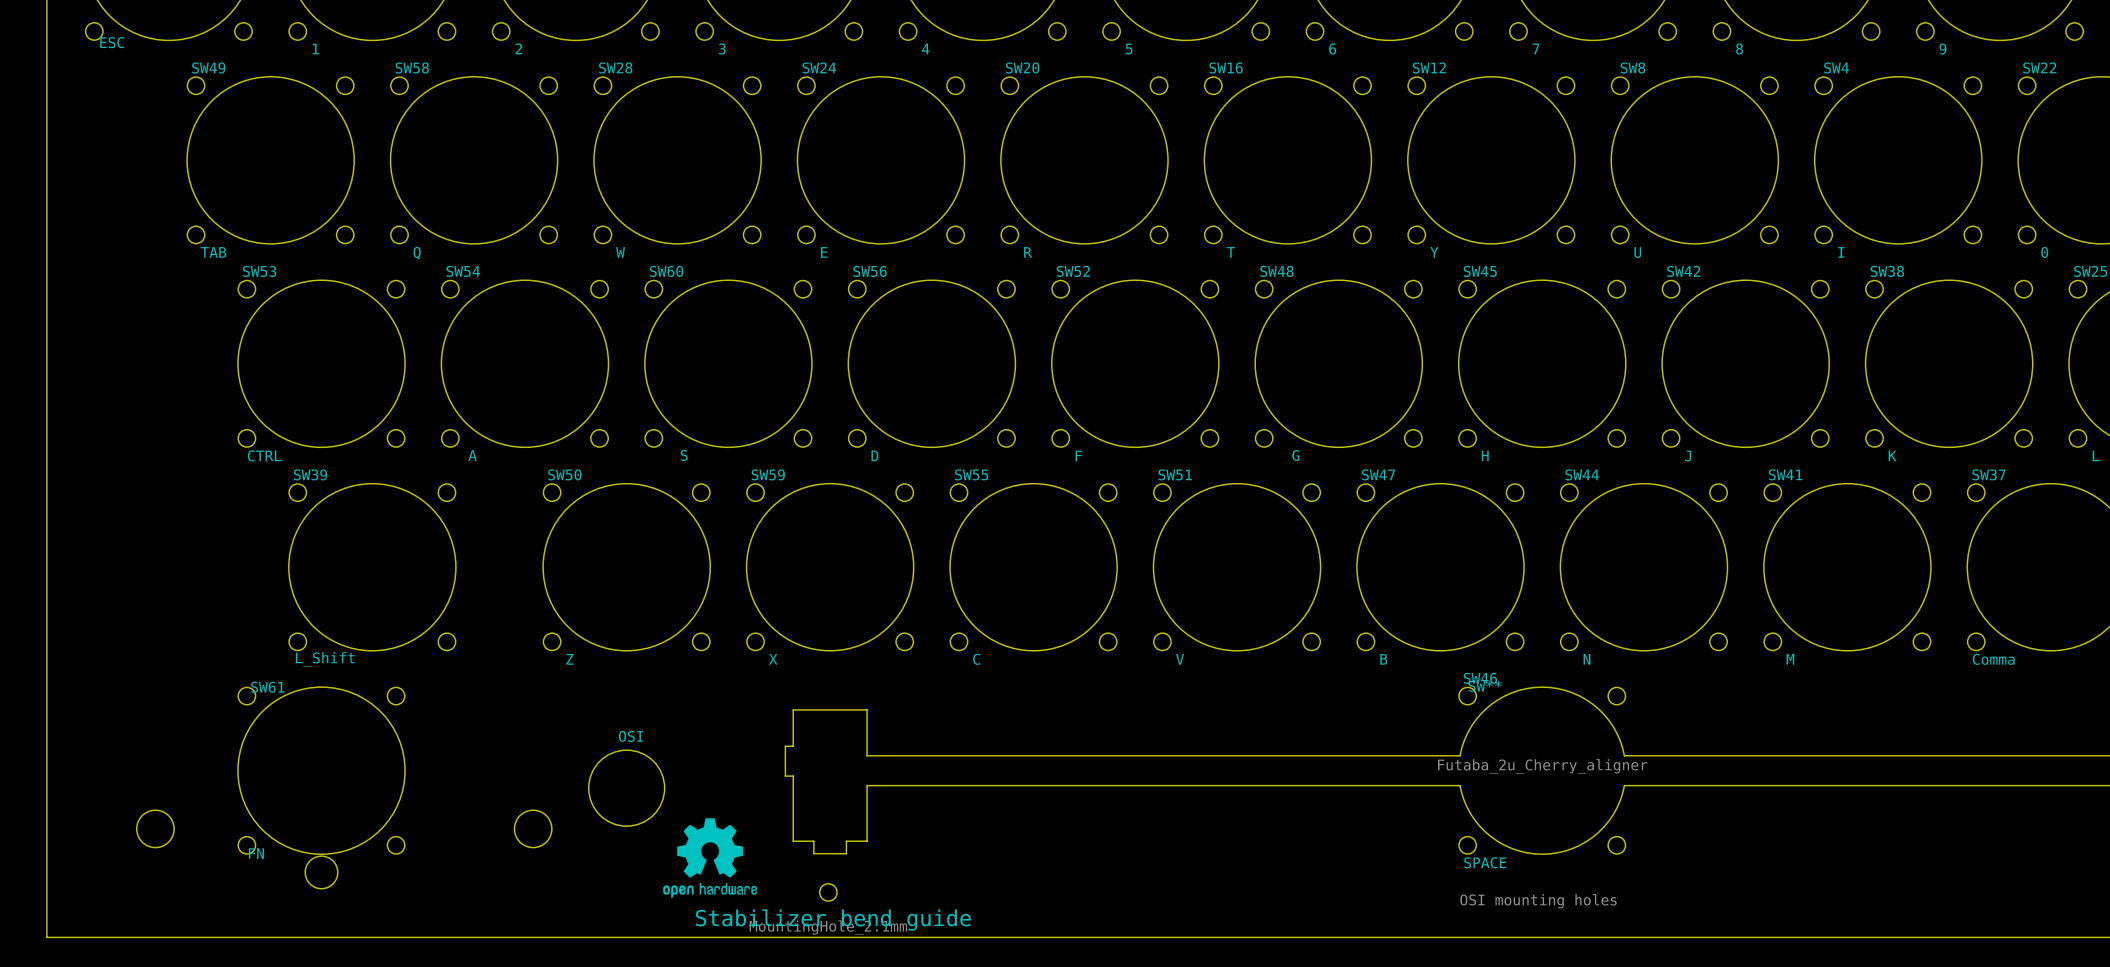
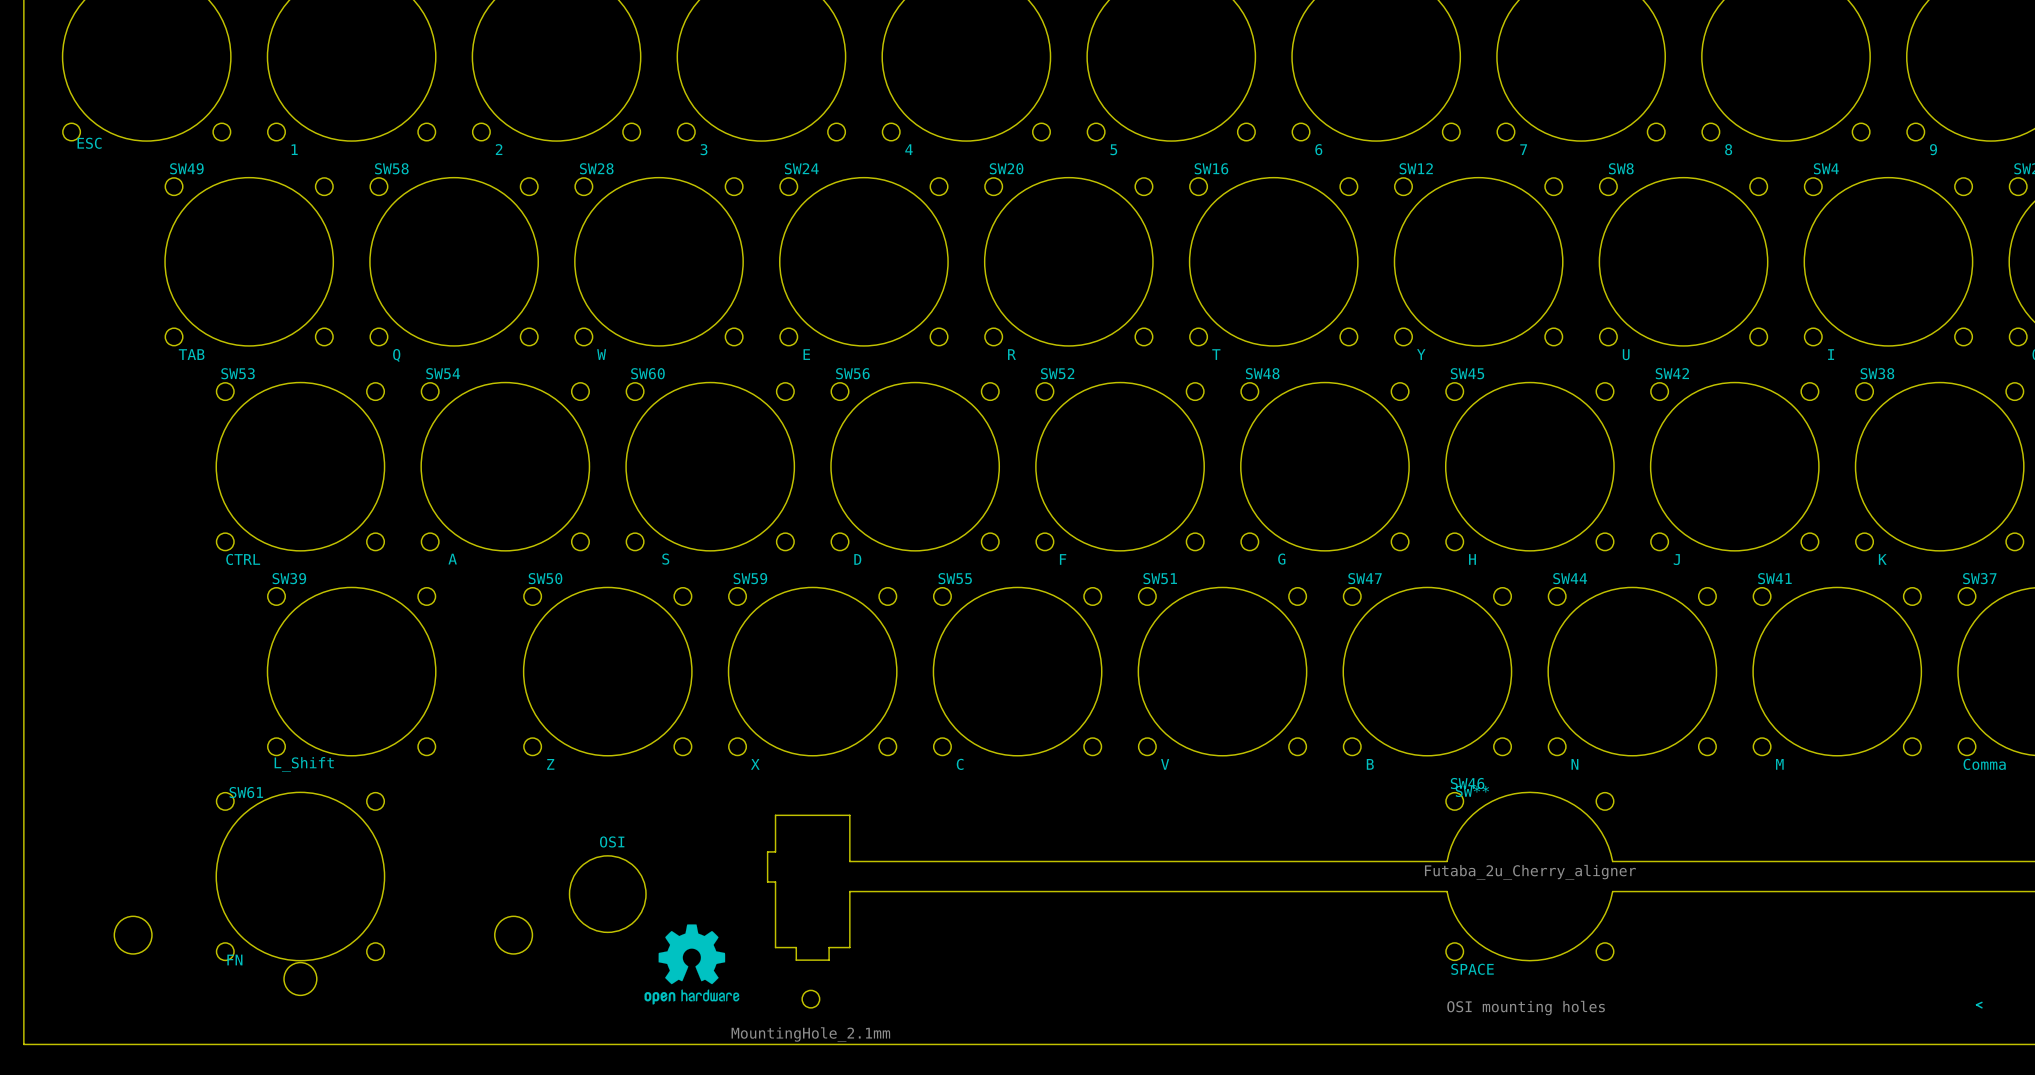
line: none -> (1981, 1002) (1976, 1004) (1981, 1007)
text: Stabilizer bend guide (833, 920) -> none

